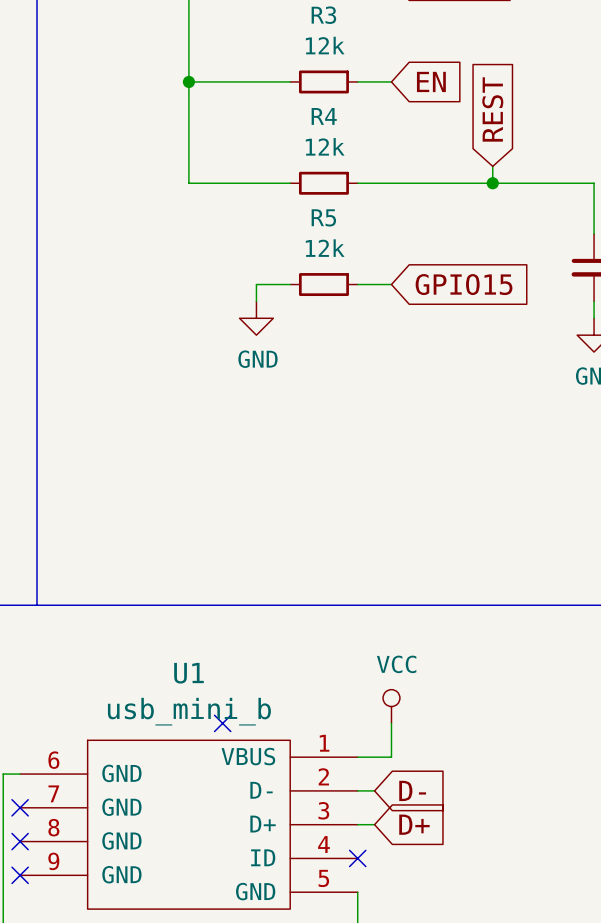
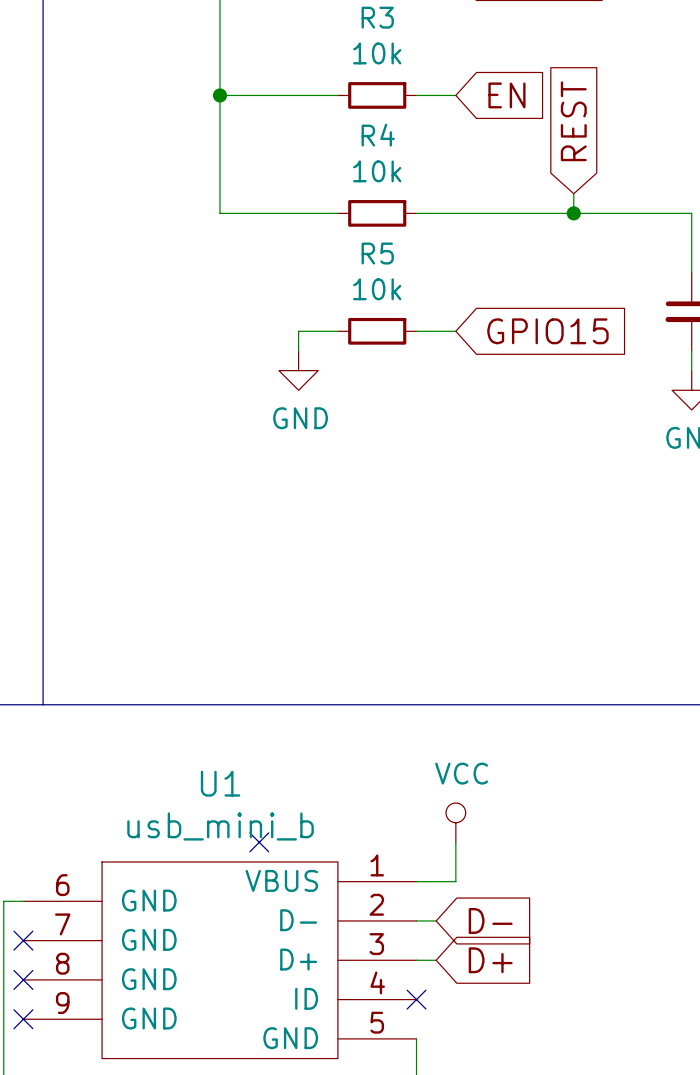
R3 value: 12k (325, 45) -> 10k (377, 53)
R4 value: 12k (325, 146) -> 10k (377, 171)
R5 value: 12k (325, 248) -> 10k (377, 289)

